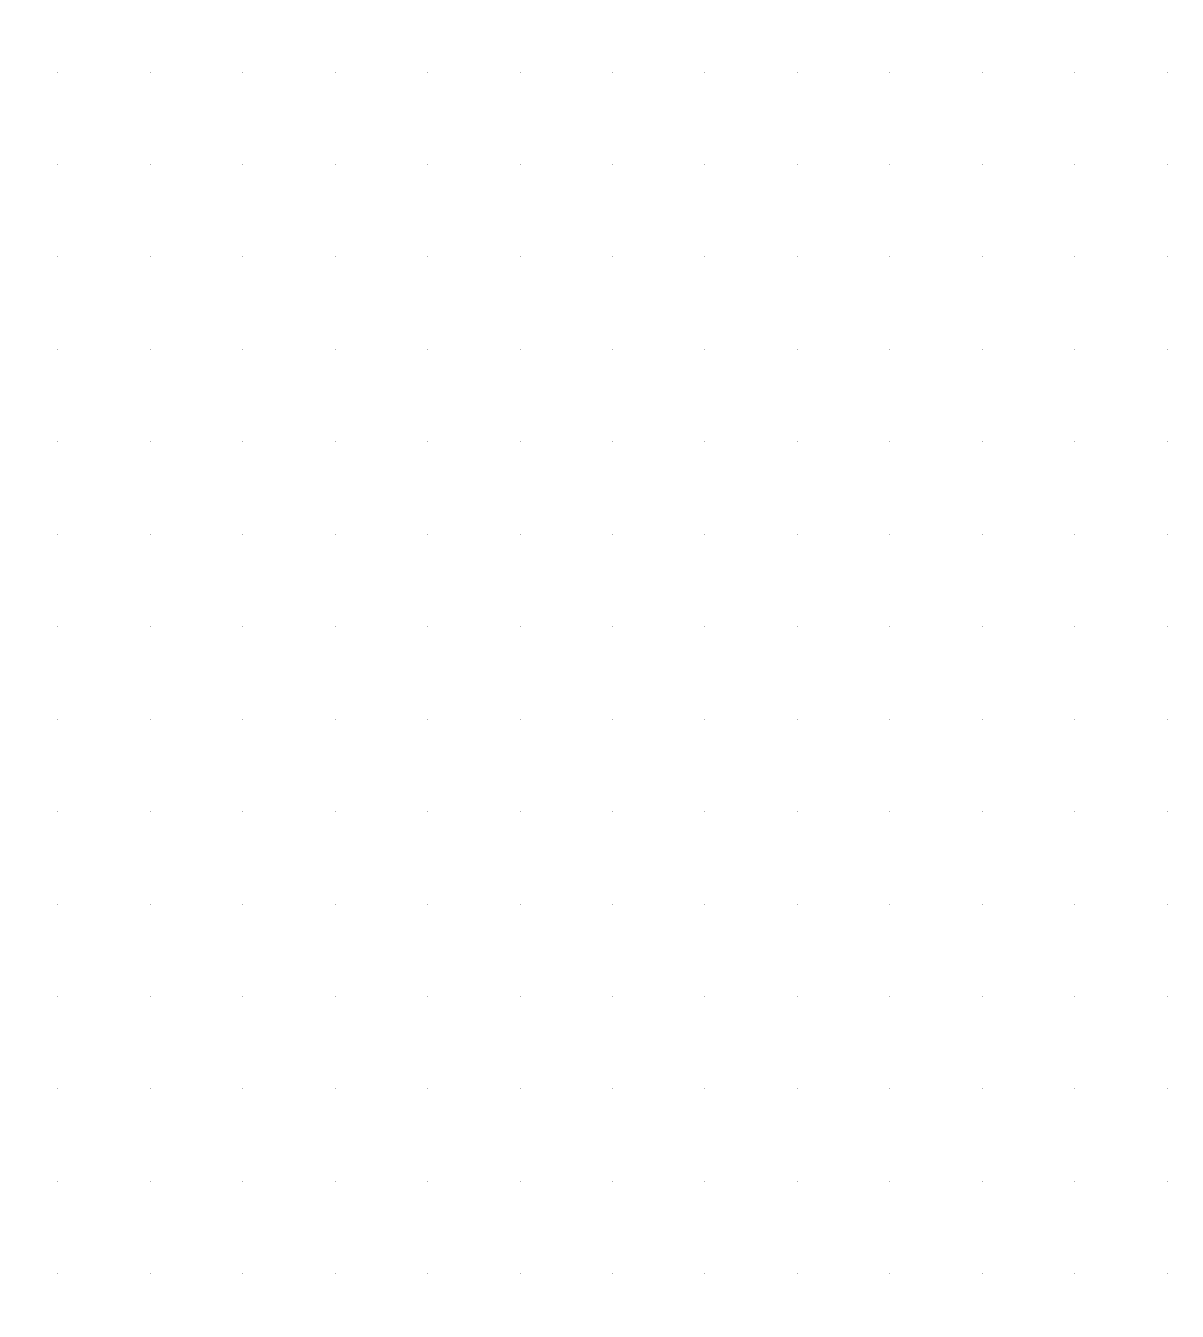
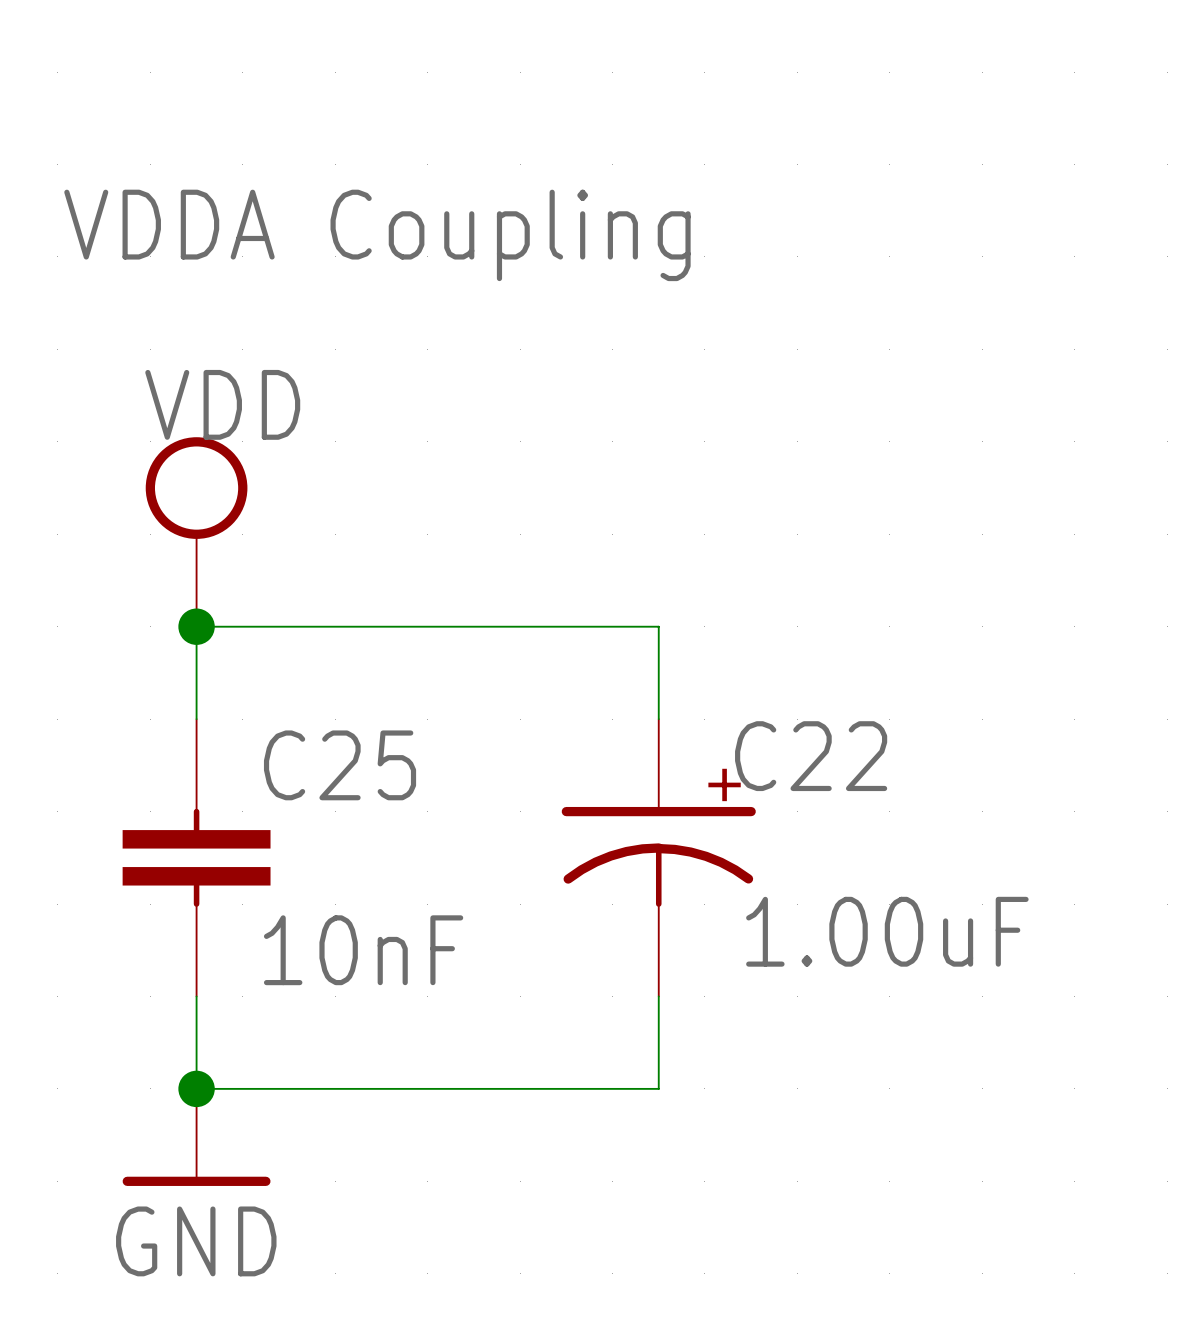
text: none -> VDDA Coupling (377, 235)
power symbol: none -> VDD (196, 531)
junction: none -> (196, 626)
wire: none -> (196, 719) (196, 626) (658, 626) (658, 719)
C25: none -> 10nF (196, 857)
C22: none -> 1.00uF (658, 857)
wire: none -> (196, 996) (196, 1088) (658, 1088) (658, 996)
junction: none -> (196, 1088)
power symbol: none -> GND (196, 1137)

